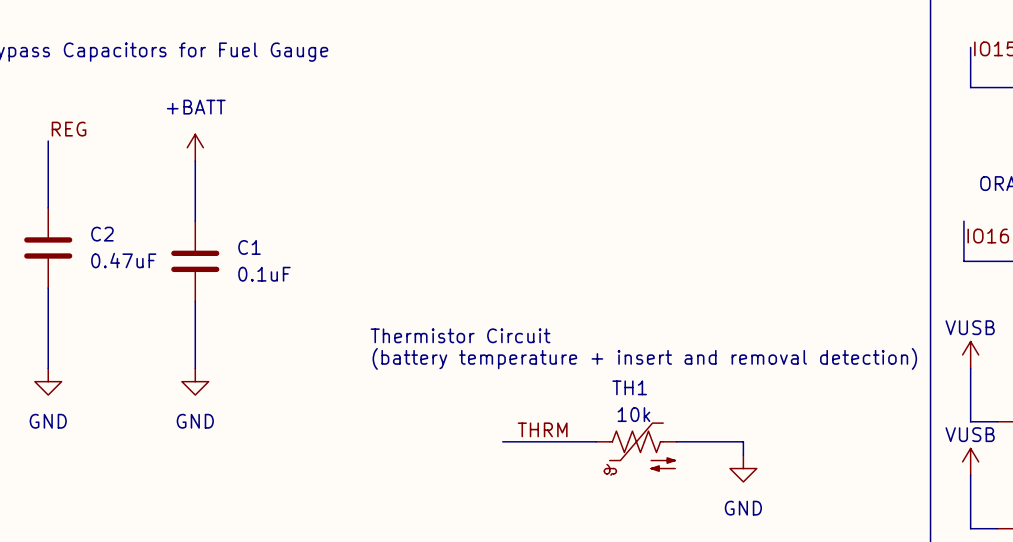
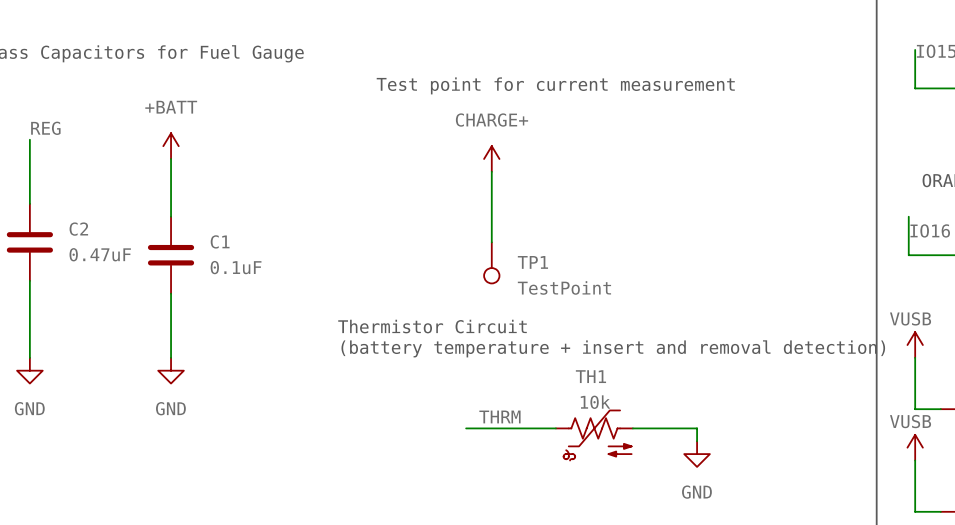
text: none -> Test point for current measurement (555, 85)
power symbol: none -> CHARGE+ (491, 158)
wire: none -> (491, 171) (491, 242)
TP1: none -> TestPoint (491, 262)

